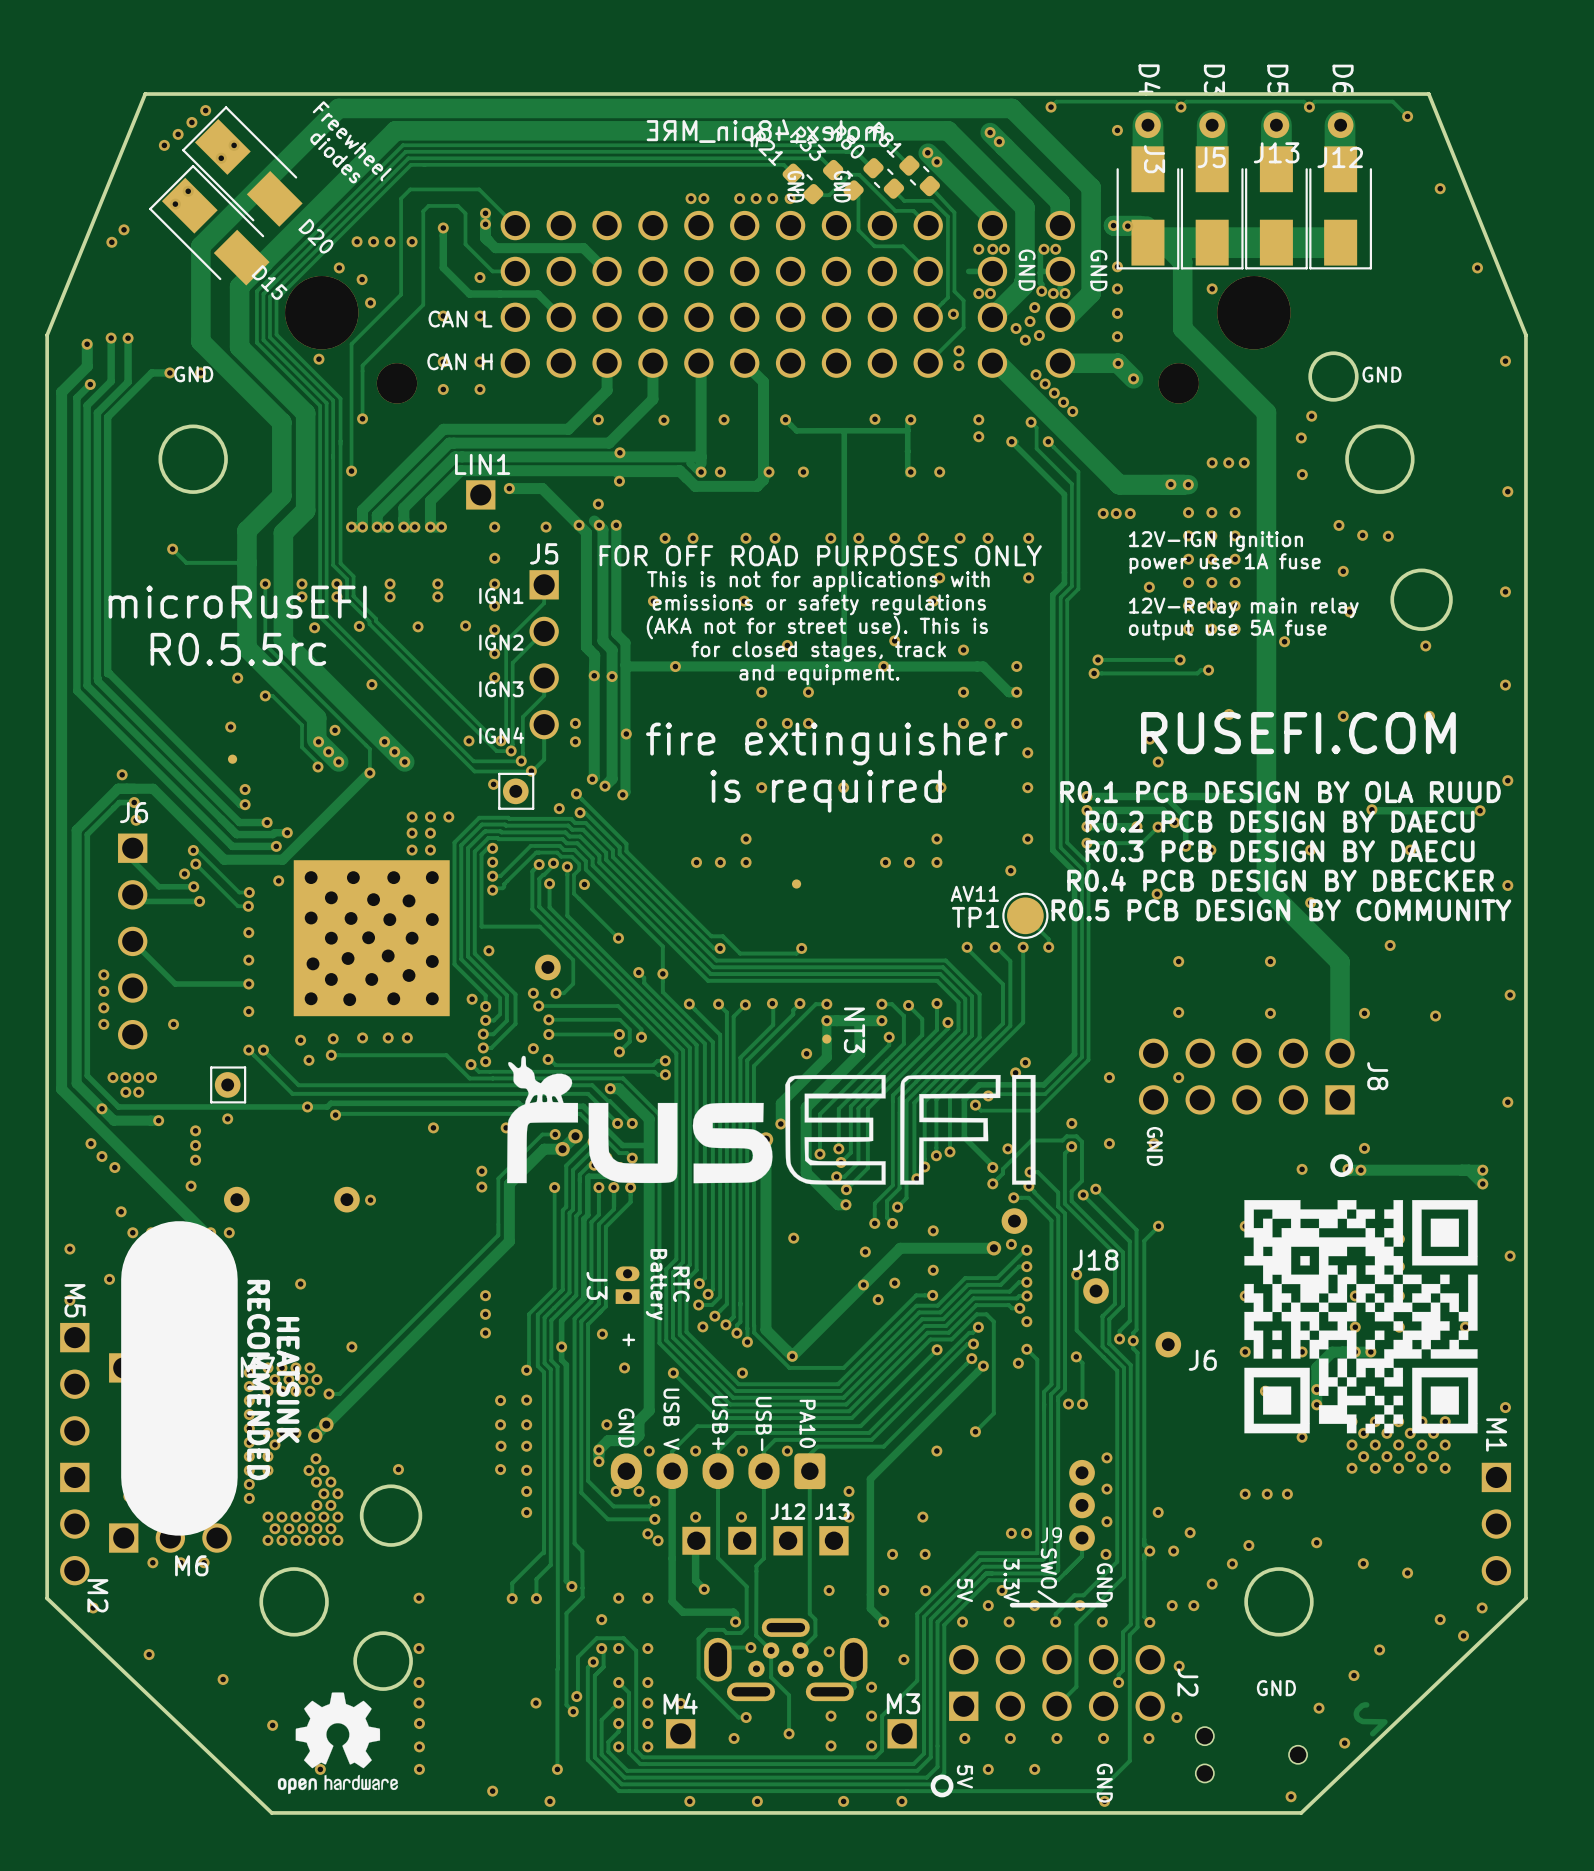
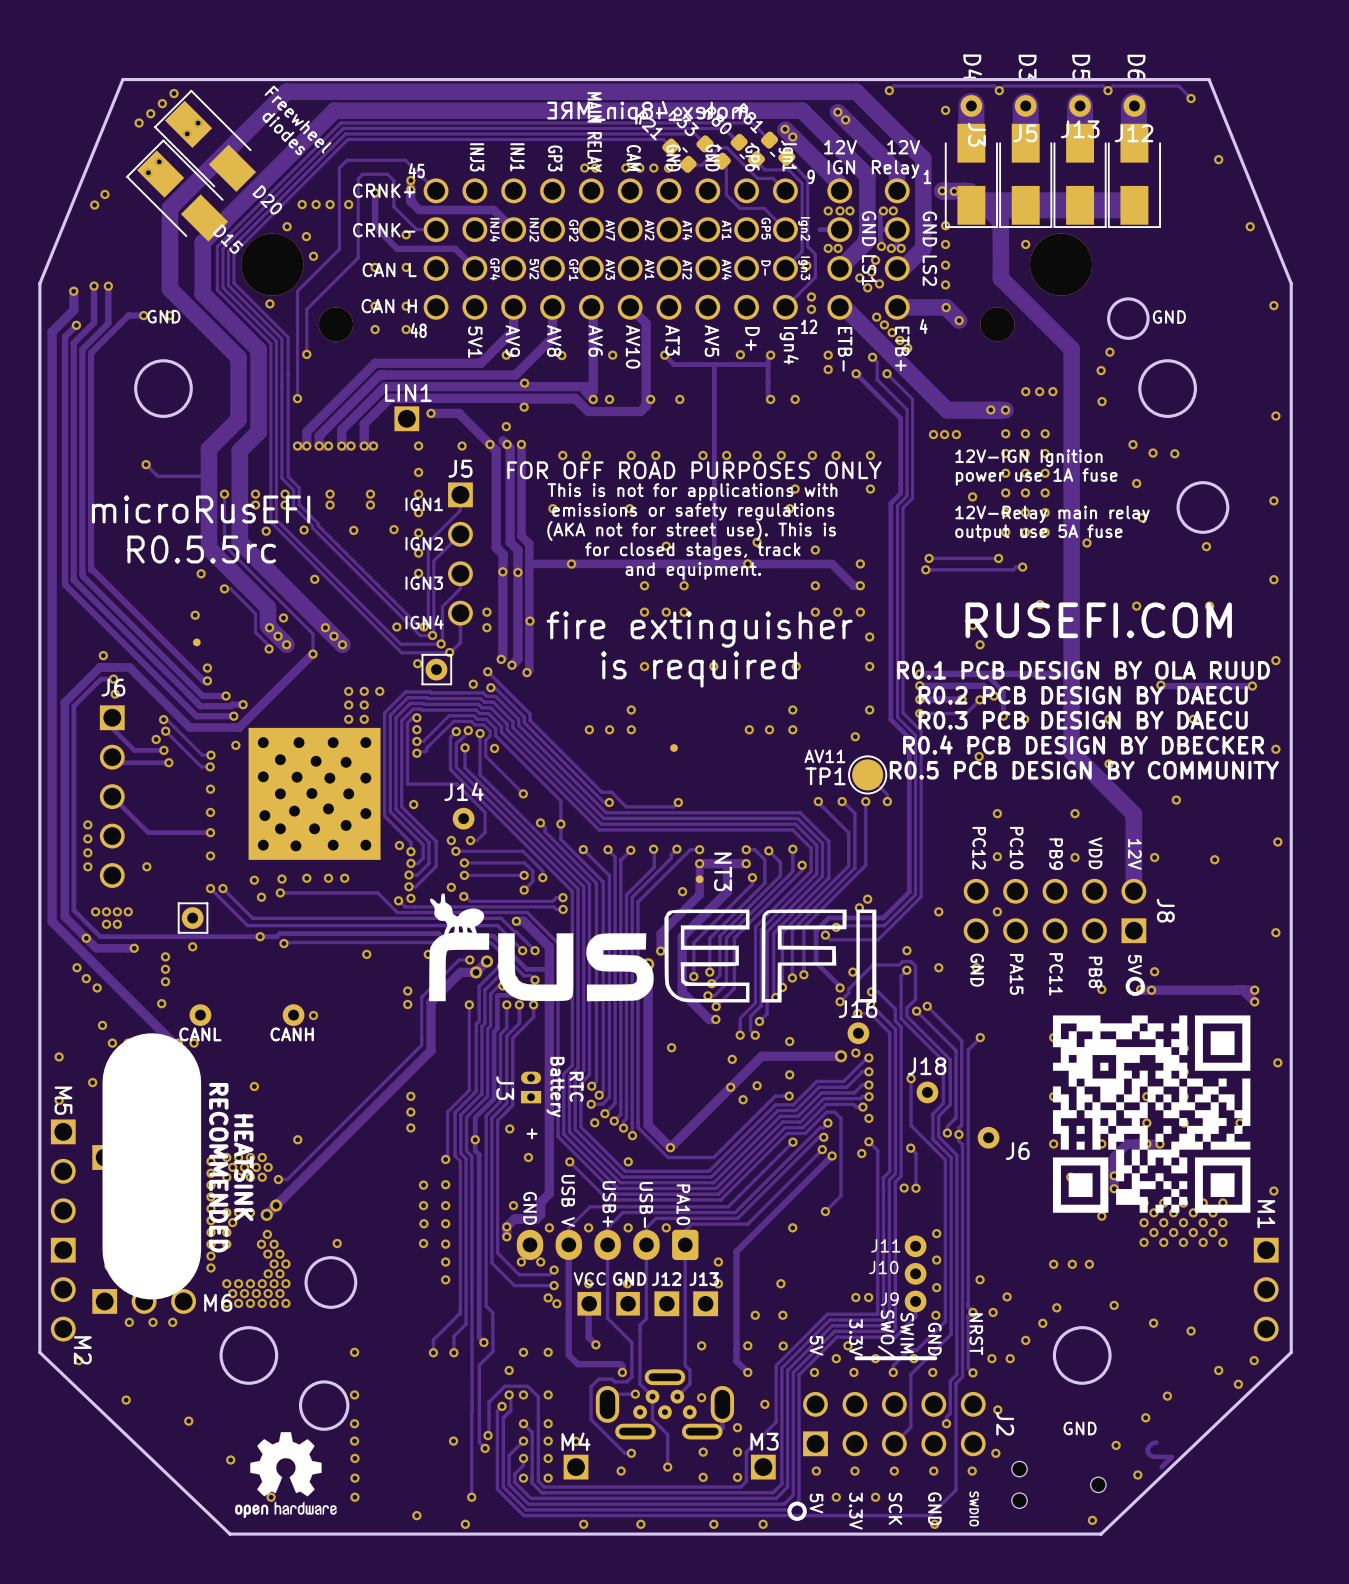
part footprint: [60, 210, 1512, 1798] -> [50, 178, 1279, 1521]

